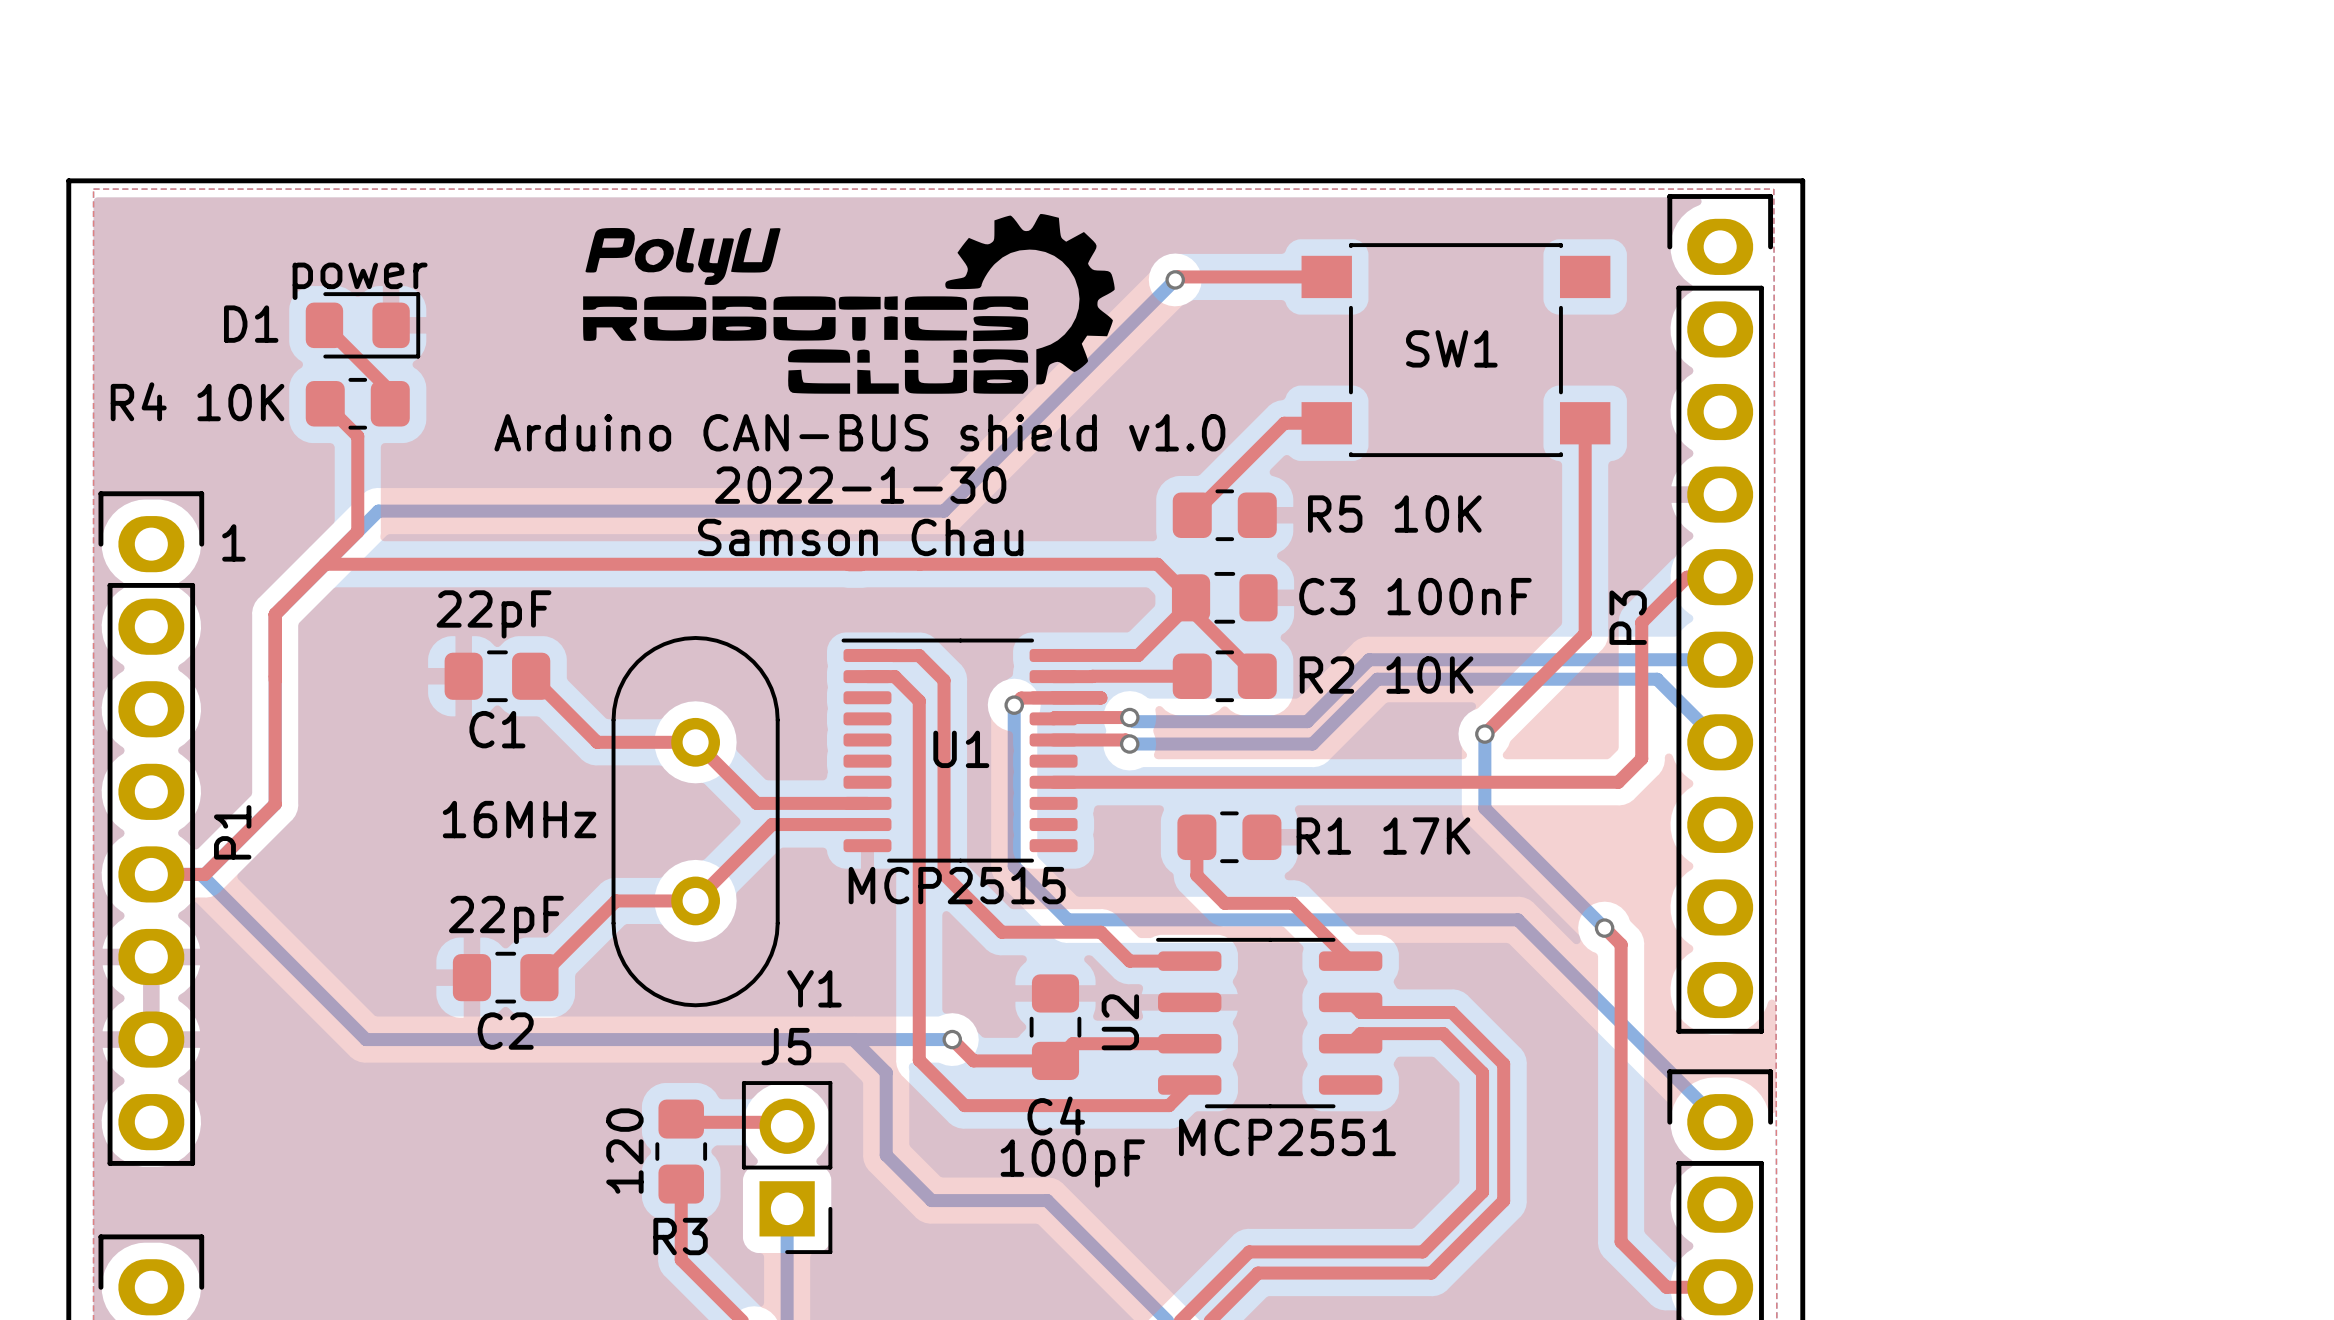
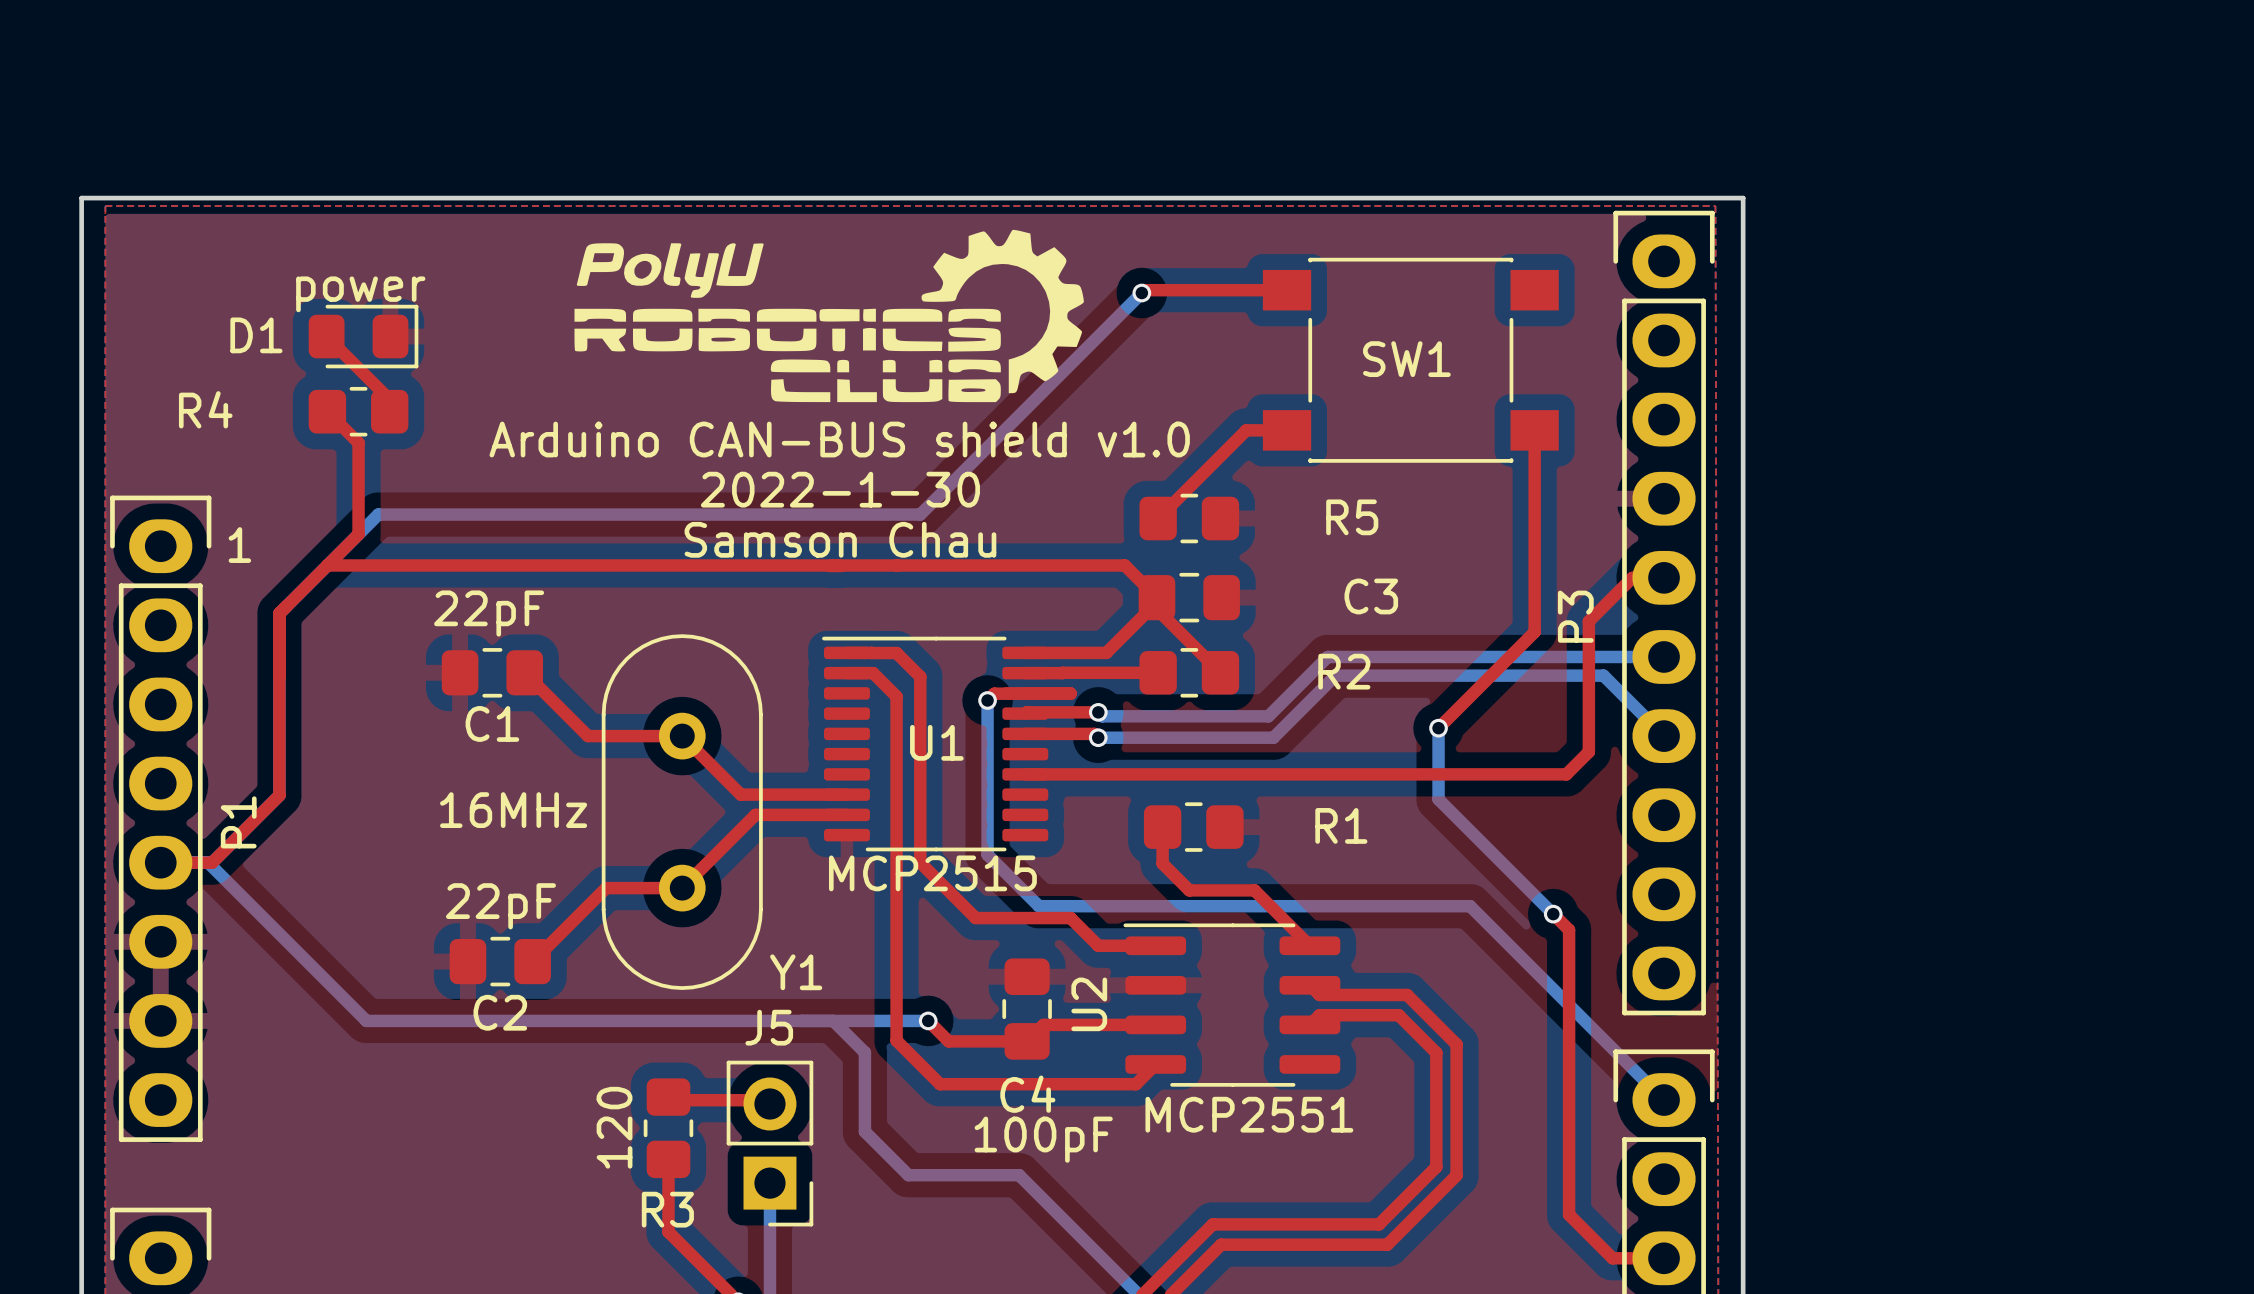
R4 10K name: R4 10K (197, 401) -> R4 (205, 409)
R5 10K name: R5 10K (1394, 514) -> R5 (1352, 517)
C3 100nF name: C3 100nF (1415, 596) -> C3 (1371, 596)
R2 10K name: R2 10K (1386, 675) -> R2 (1344, 671)
R1 17K name: R1 17K (1383, 836) -> R1 (1341, 825)

